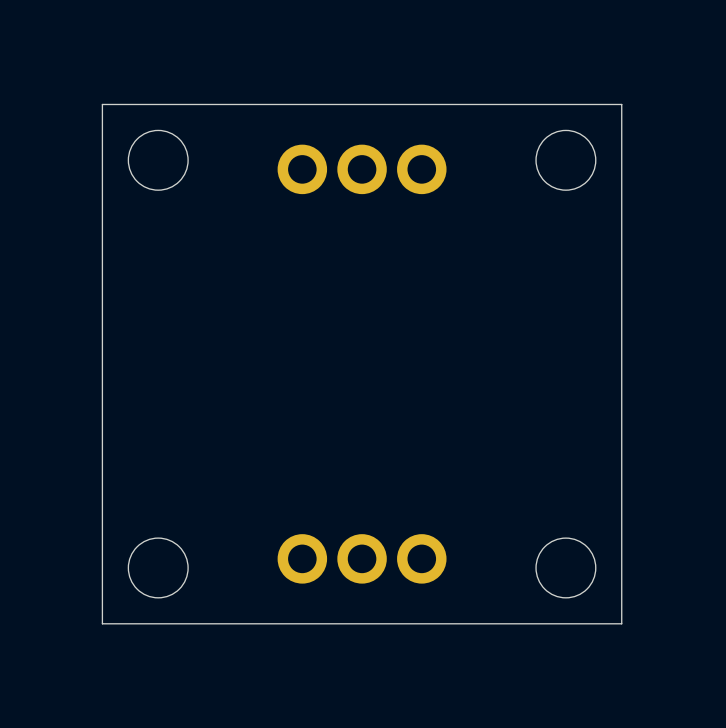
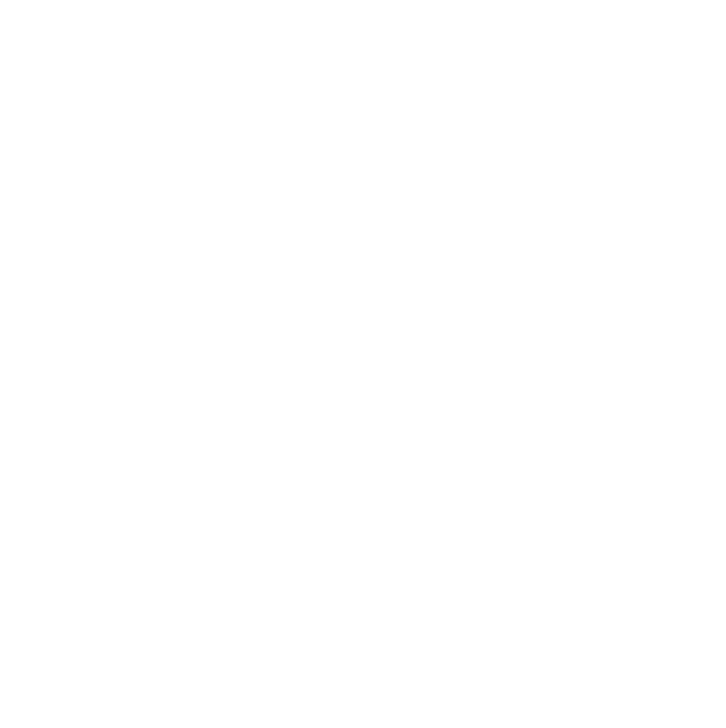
board edge: (621, 104) (102, 104) (102, 623) (621, 623) (621, 104) -> none
round board edge: [127, 129, 189, 191] -> none
round board edge: [535, 129, 597, 191] -> none
part: (362, 169) -> none
round board edge: [127, 537, 189, 599] -> none
round board edge: [535, 537, 597, 599] -> none
part: (362, 558) -> none

